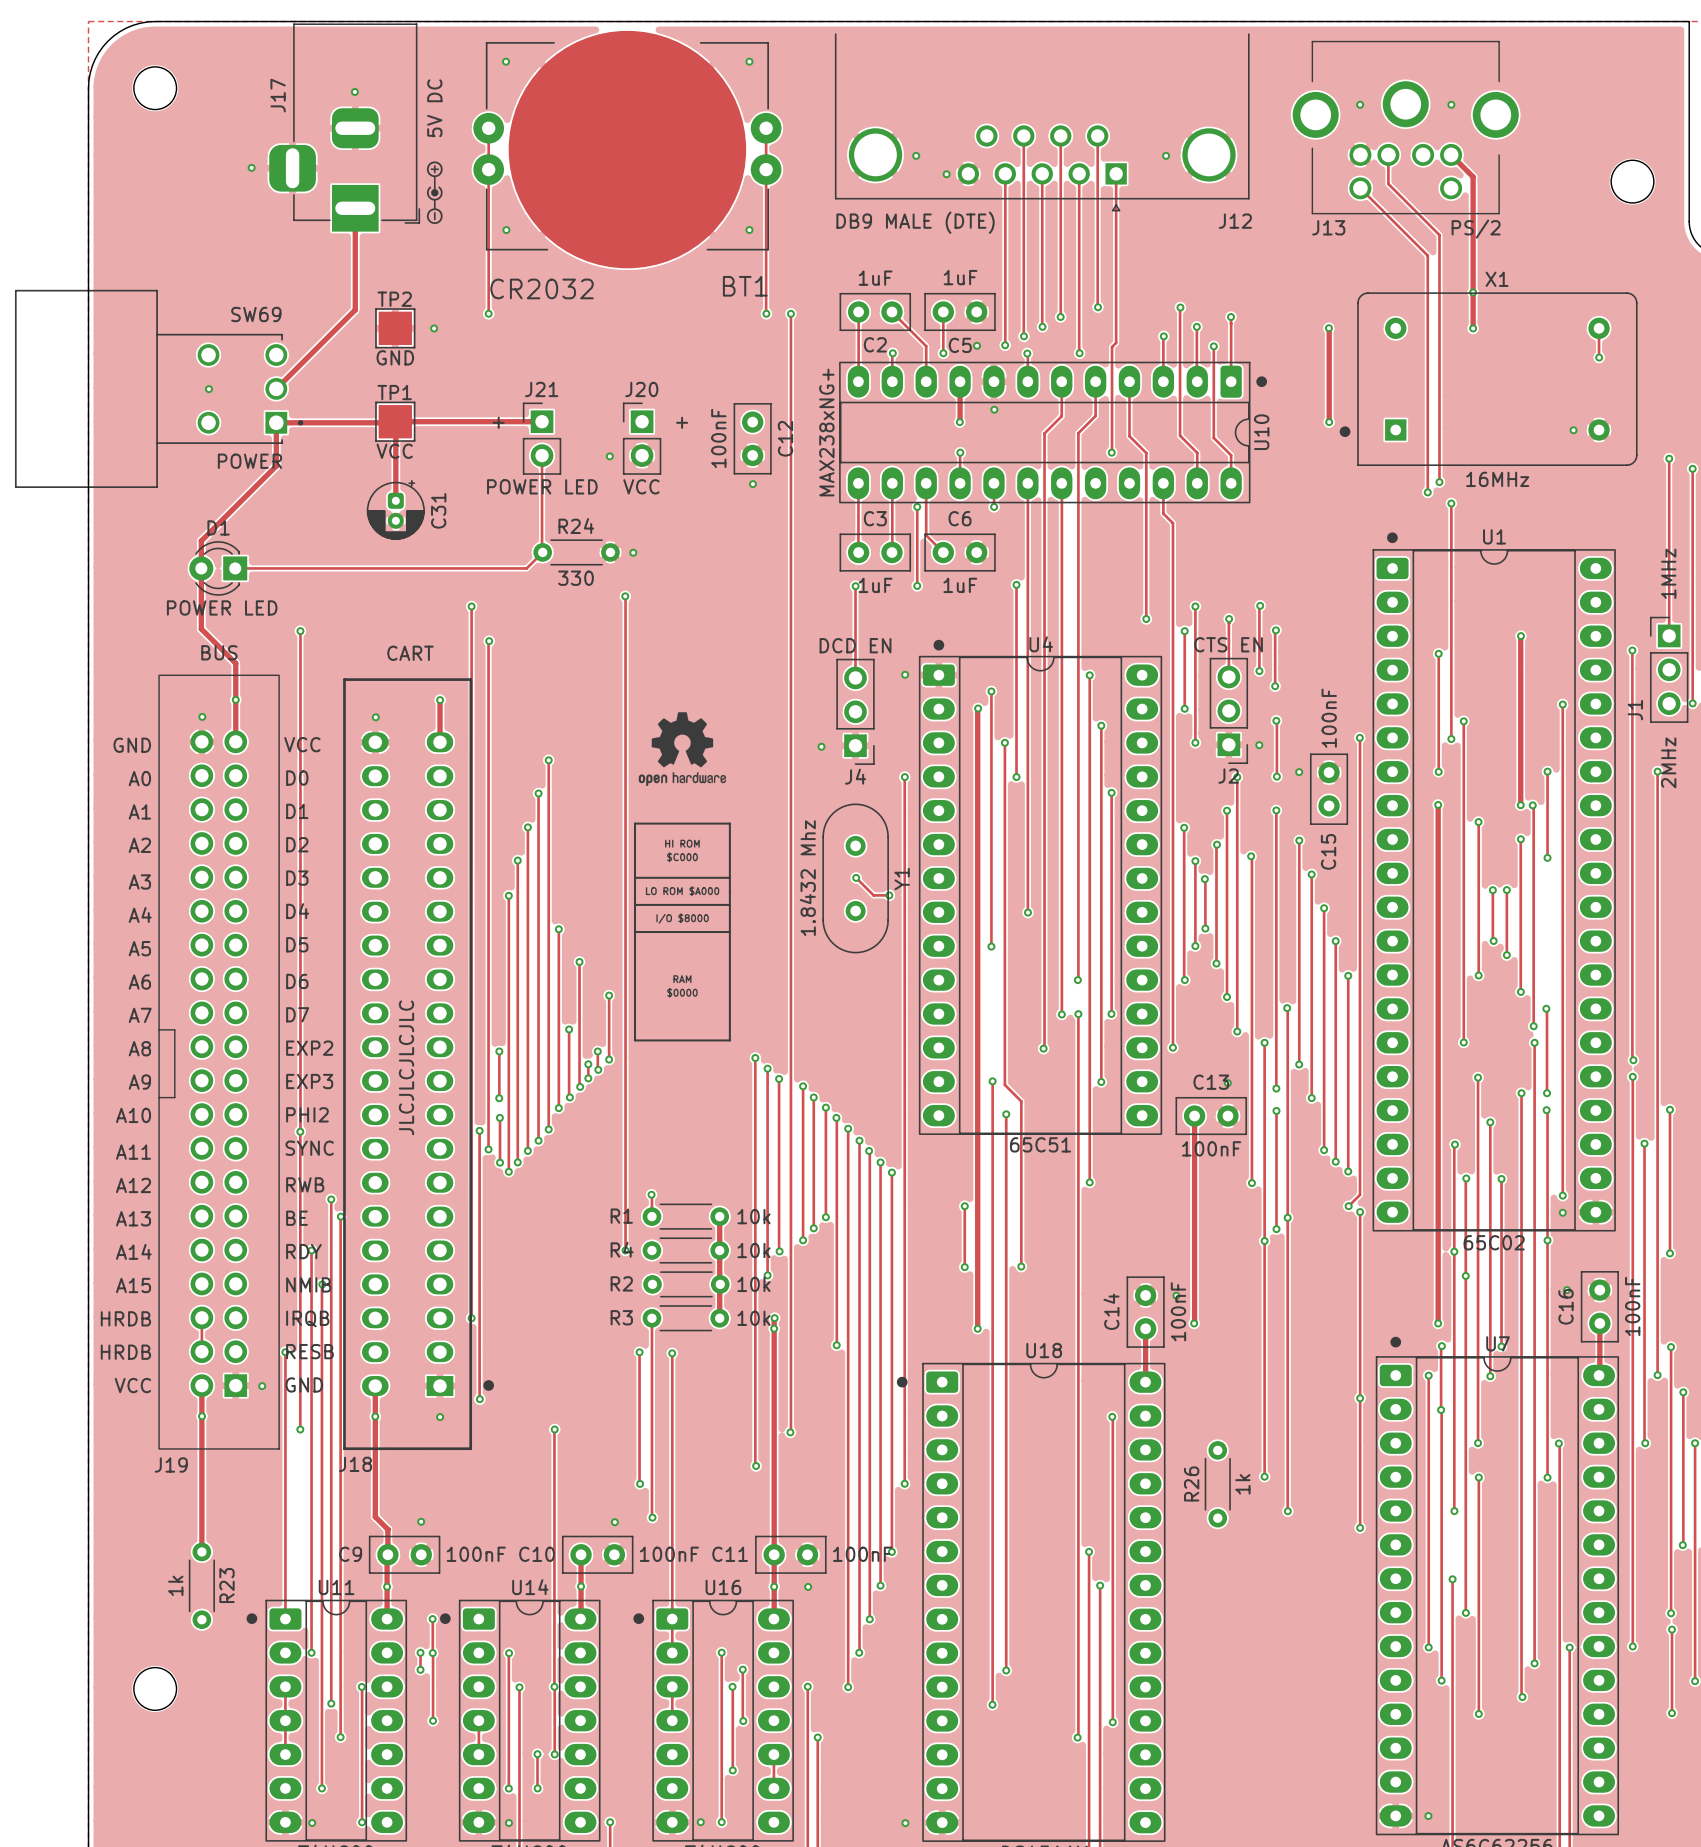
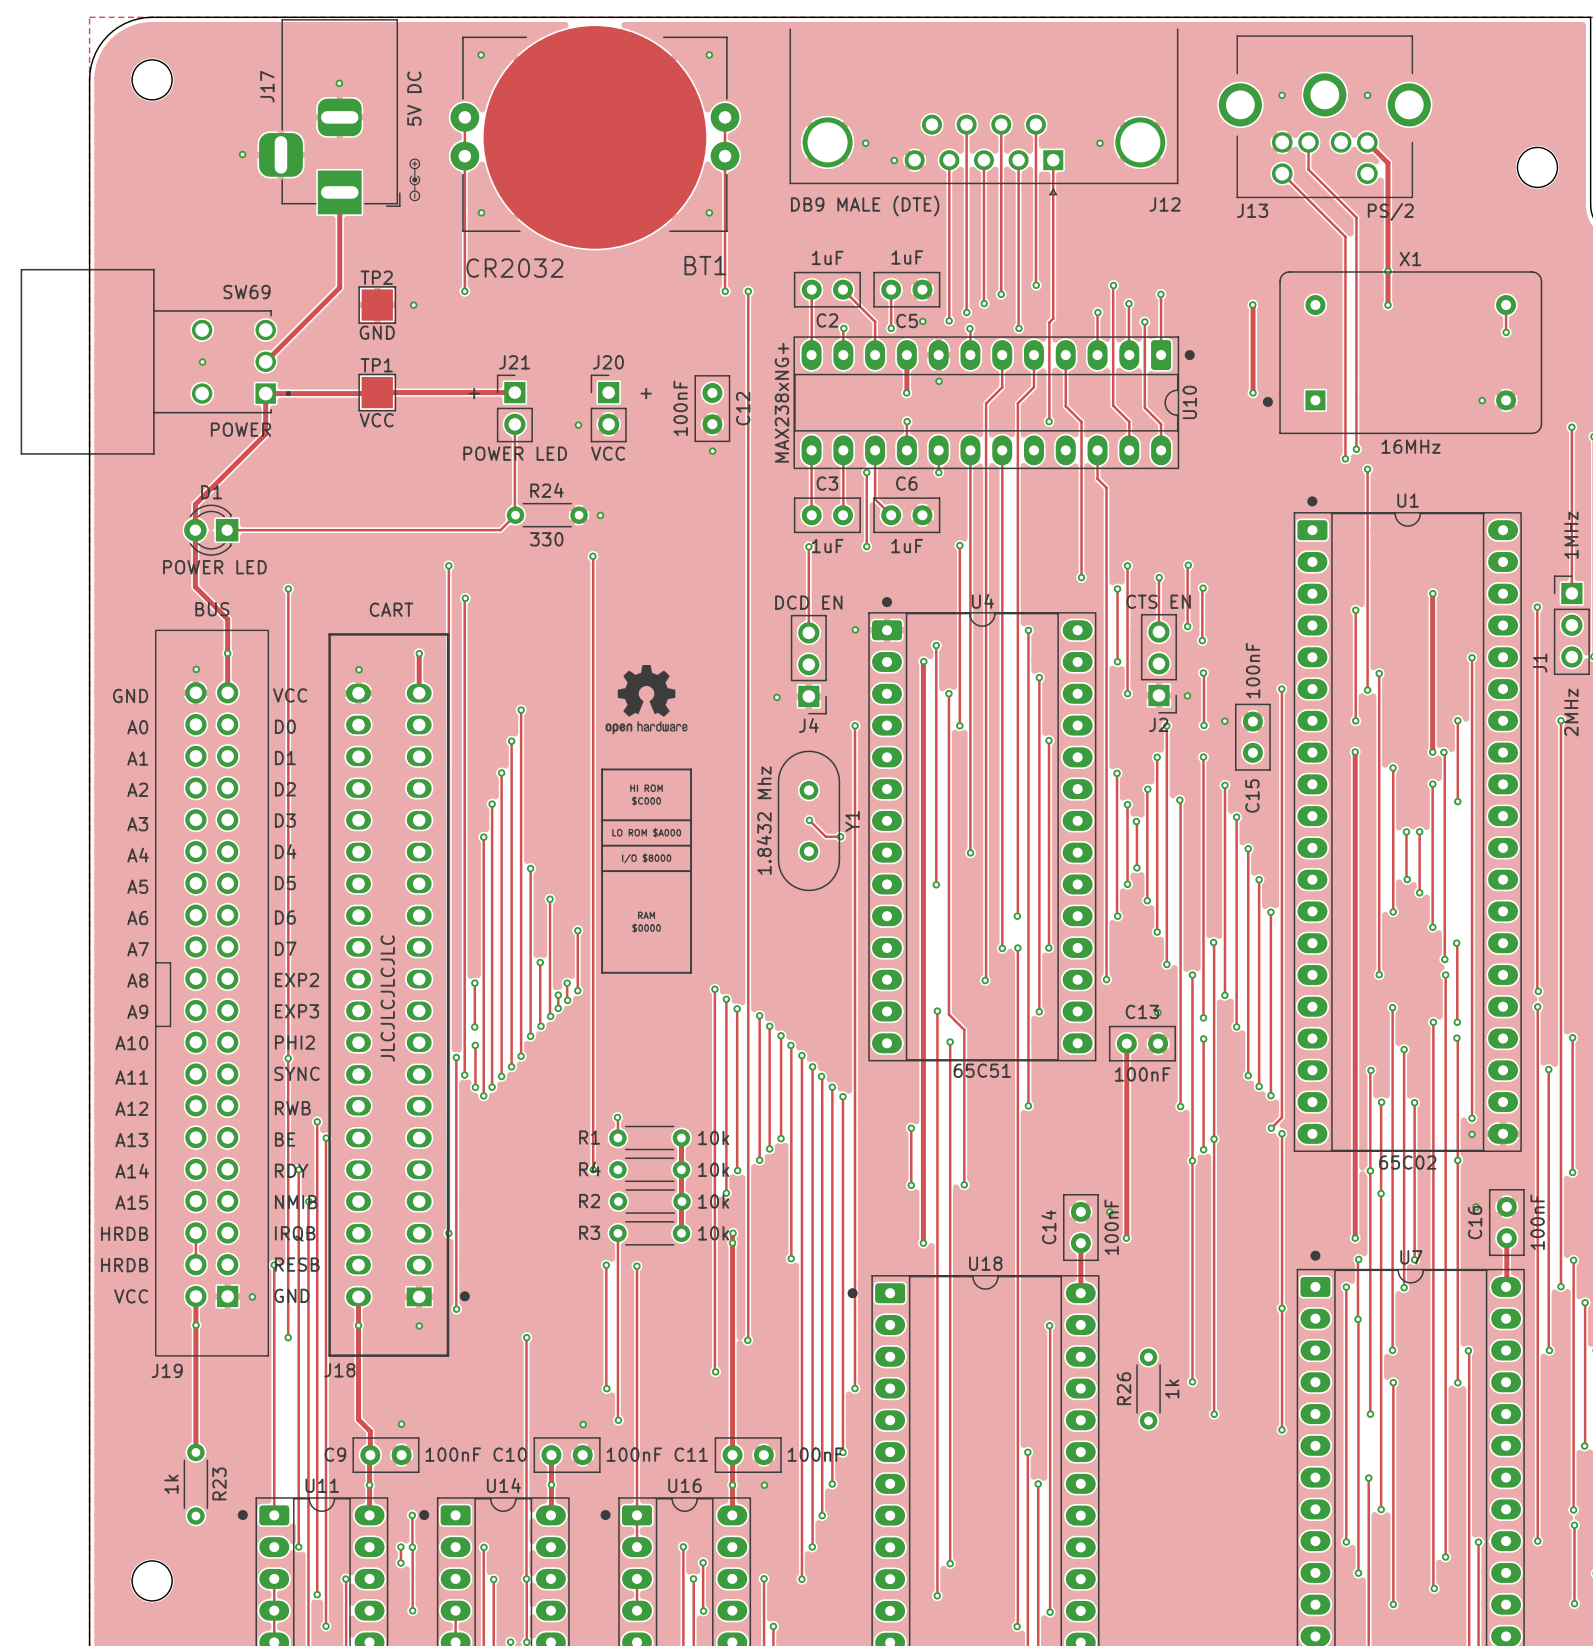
drawing shape: [426, 161, 443, 225] -> [409, 158, 421, 202]
track: (395, 421) (395, 500) -> none
C31: (395, 509) -> none

